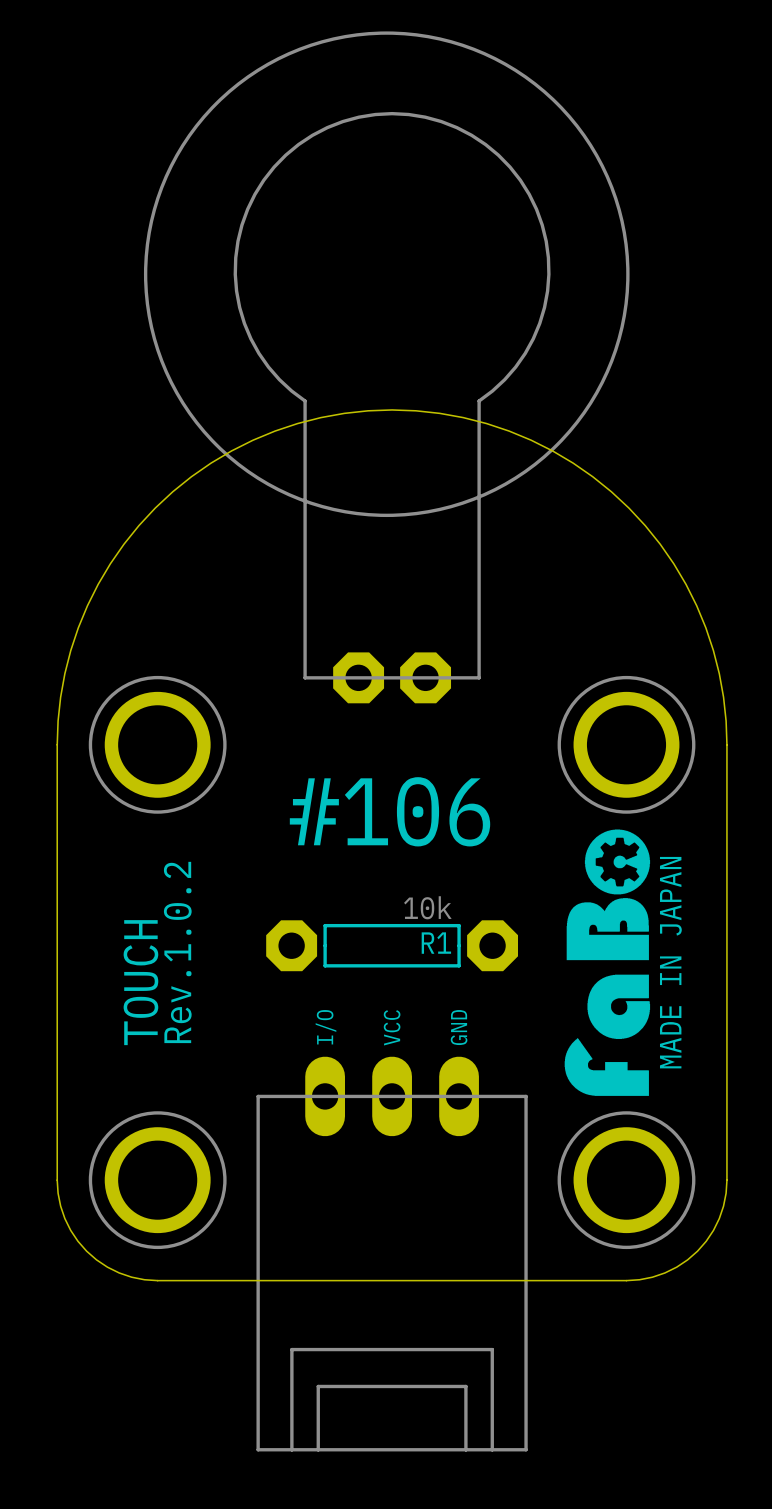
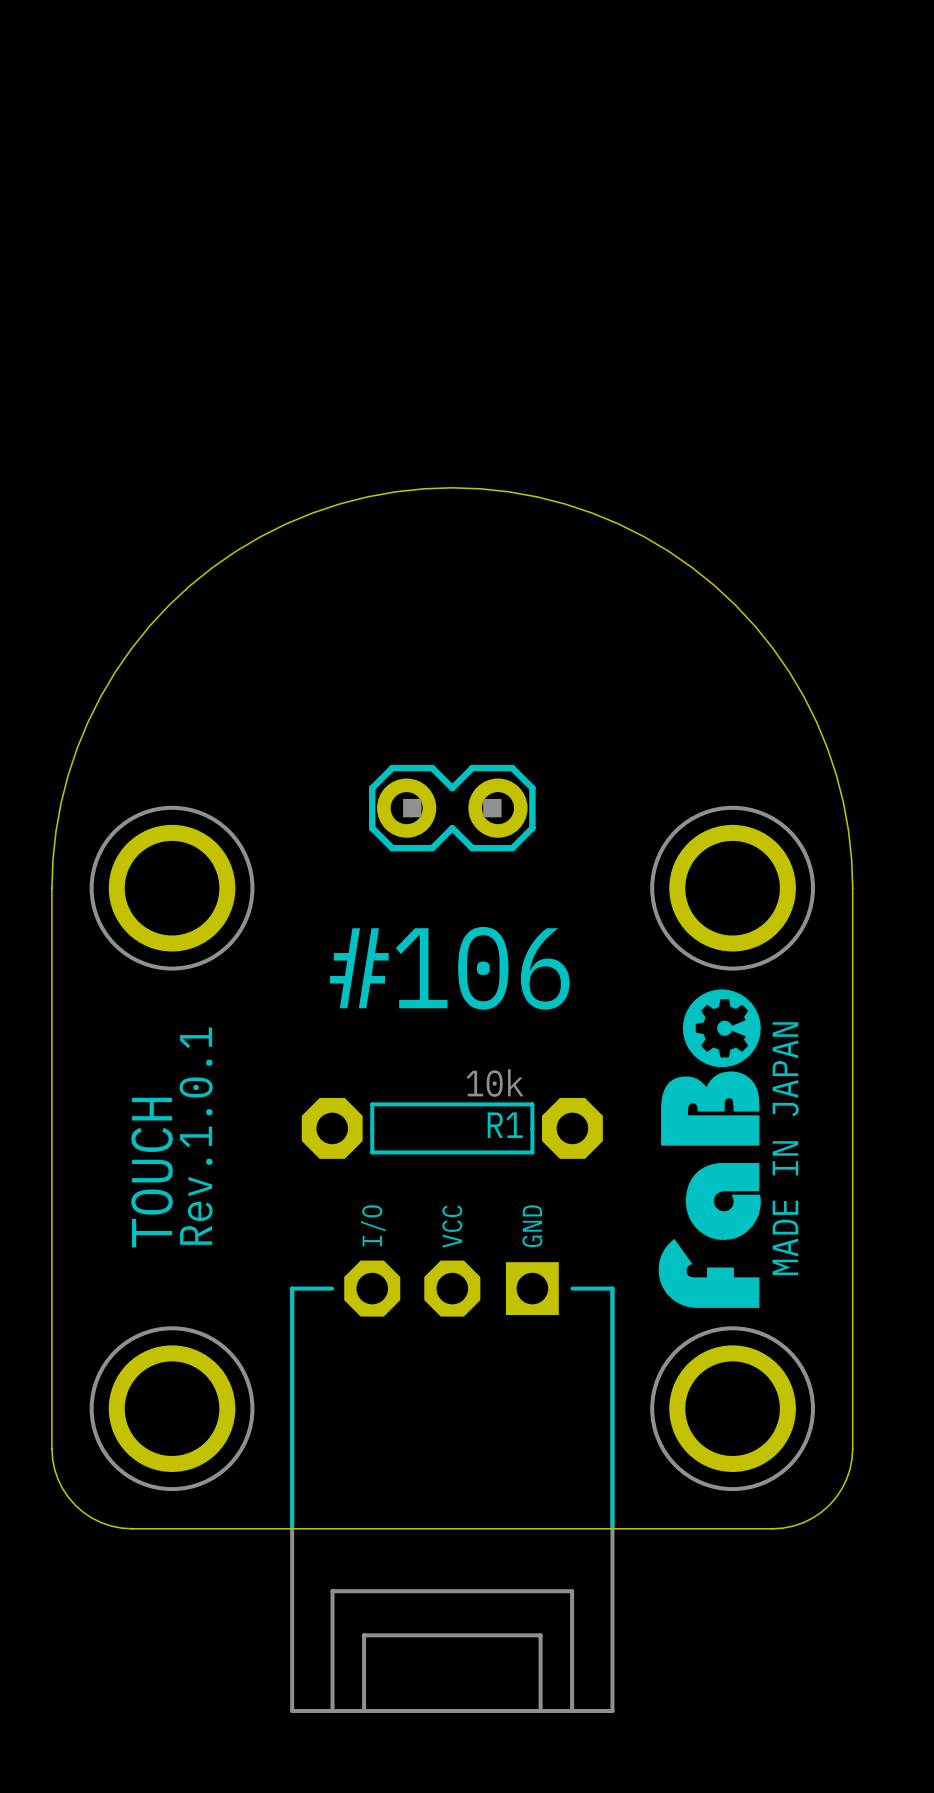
part: (386, 367) -> none
part footprint: [57, 409, 727, 1452] -> [51, 487, 853, 1714]
part: none -> (452, 808)
text: Rev.1.0.2 (177, 952) -> Rev.1.0.1 (196, 1136)

